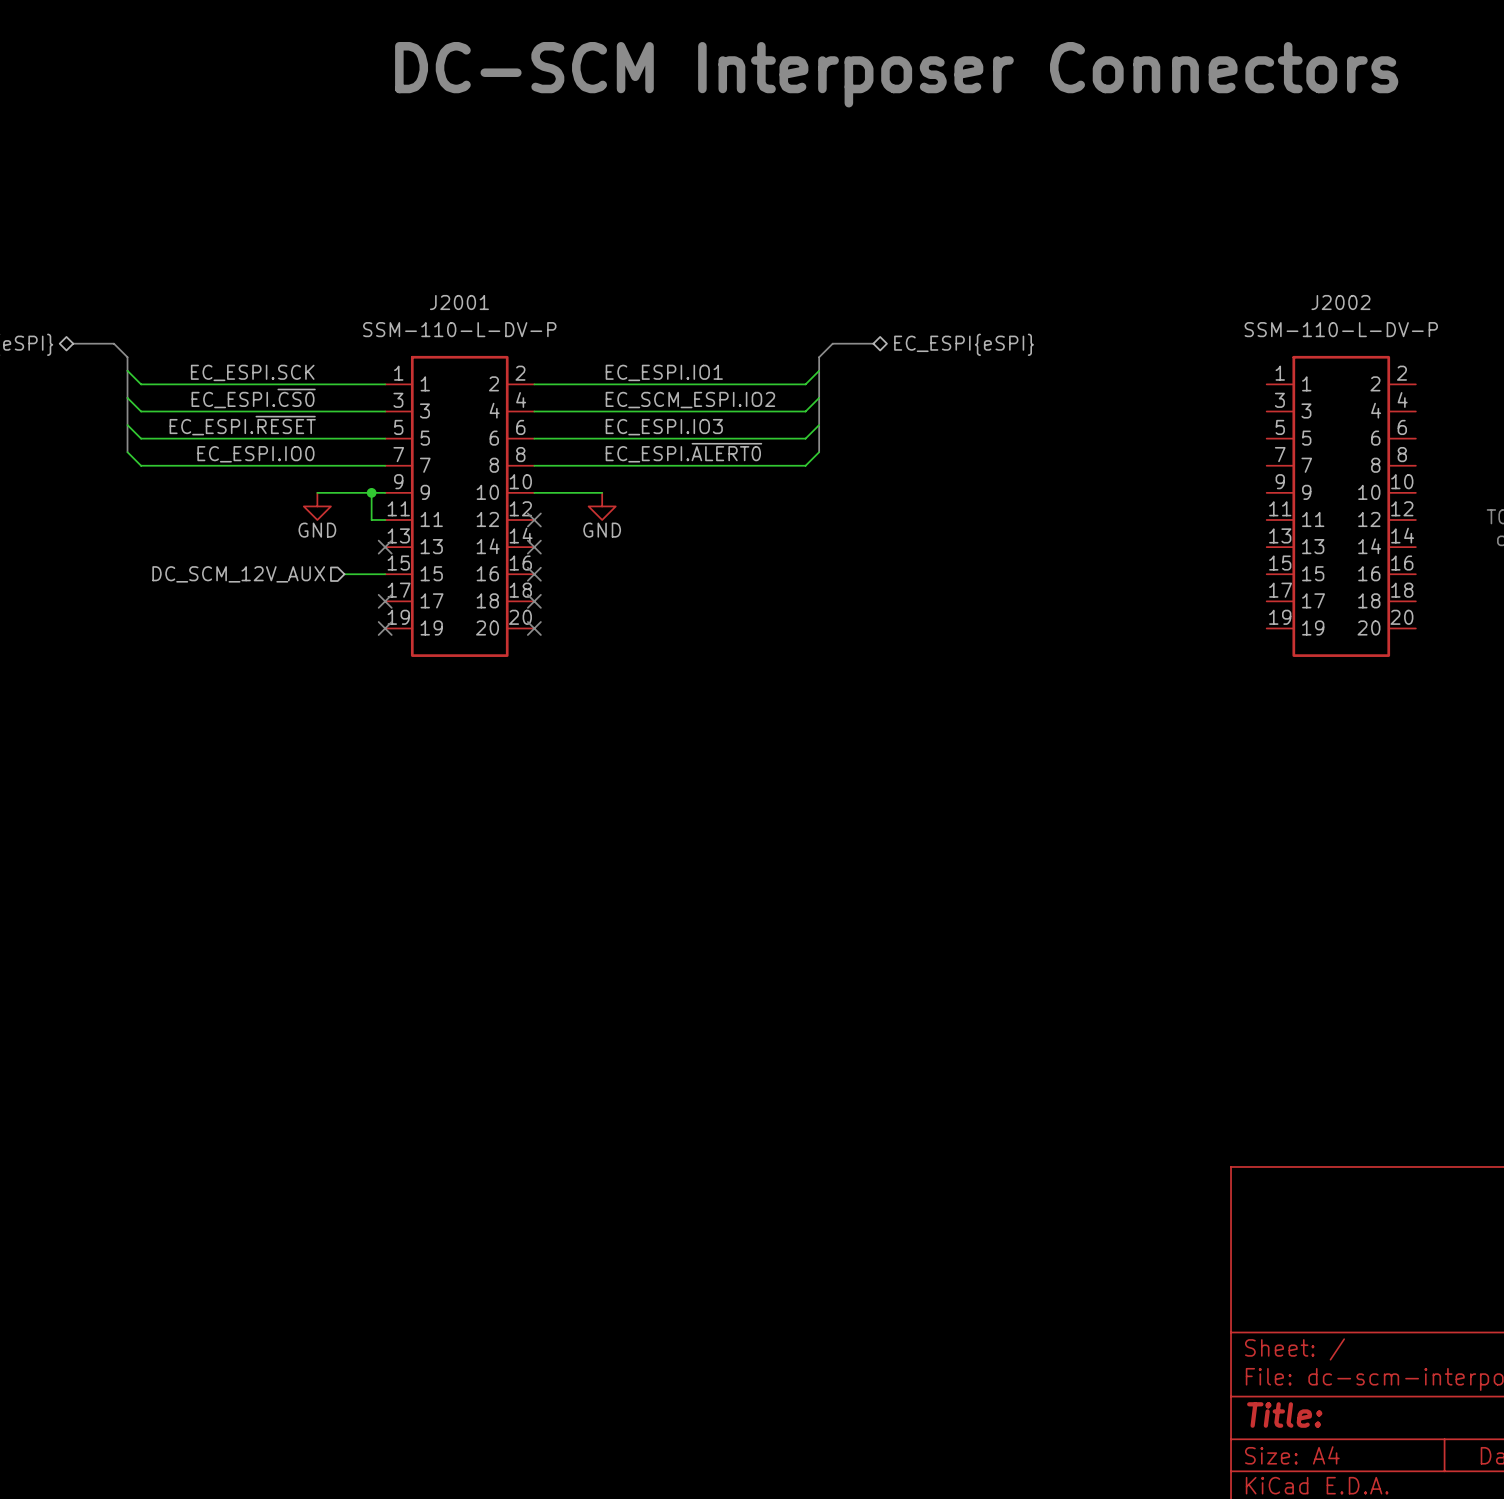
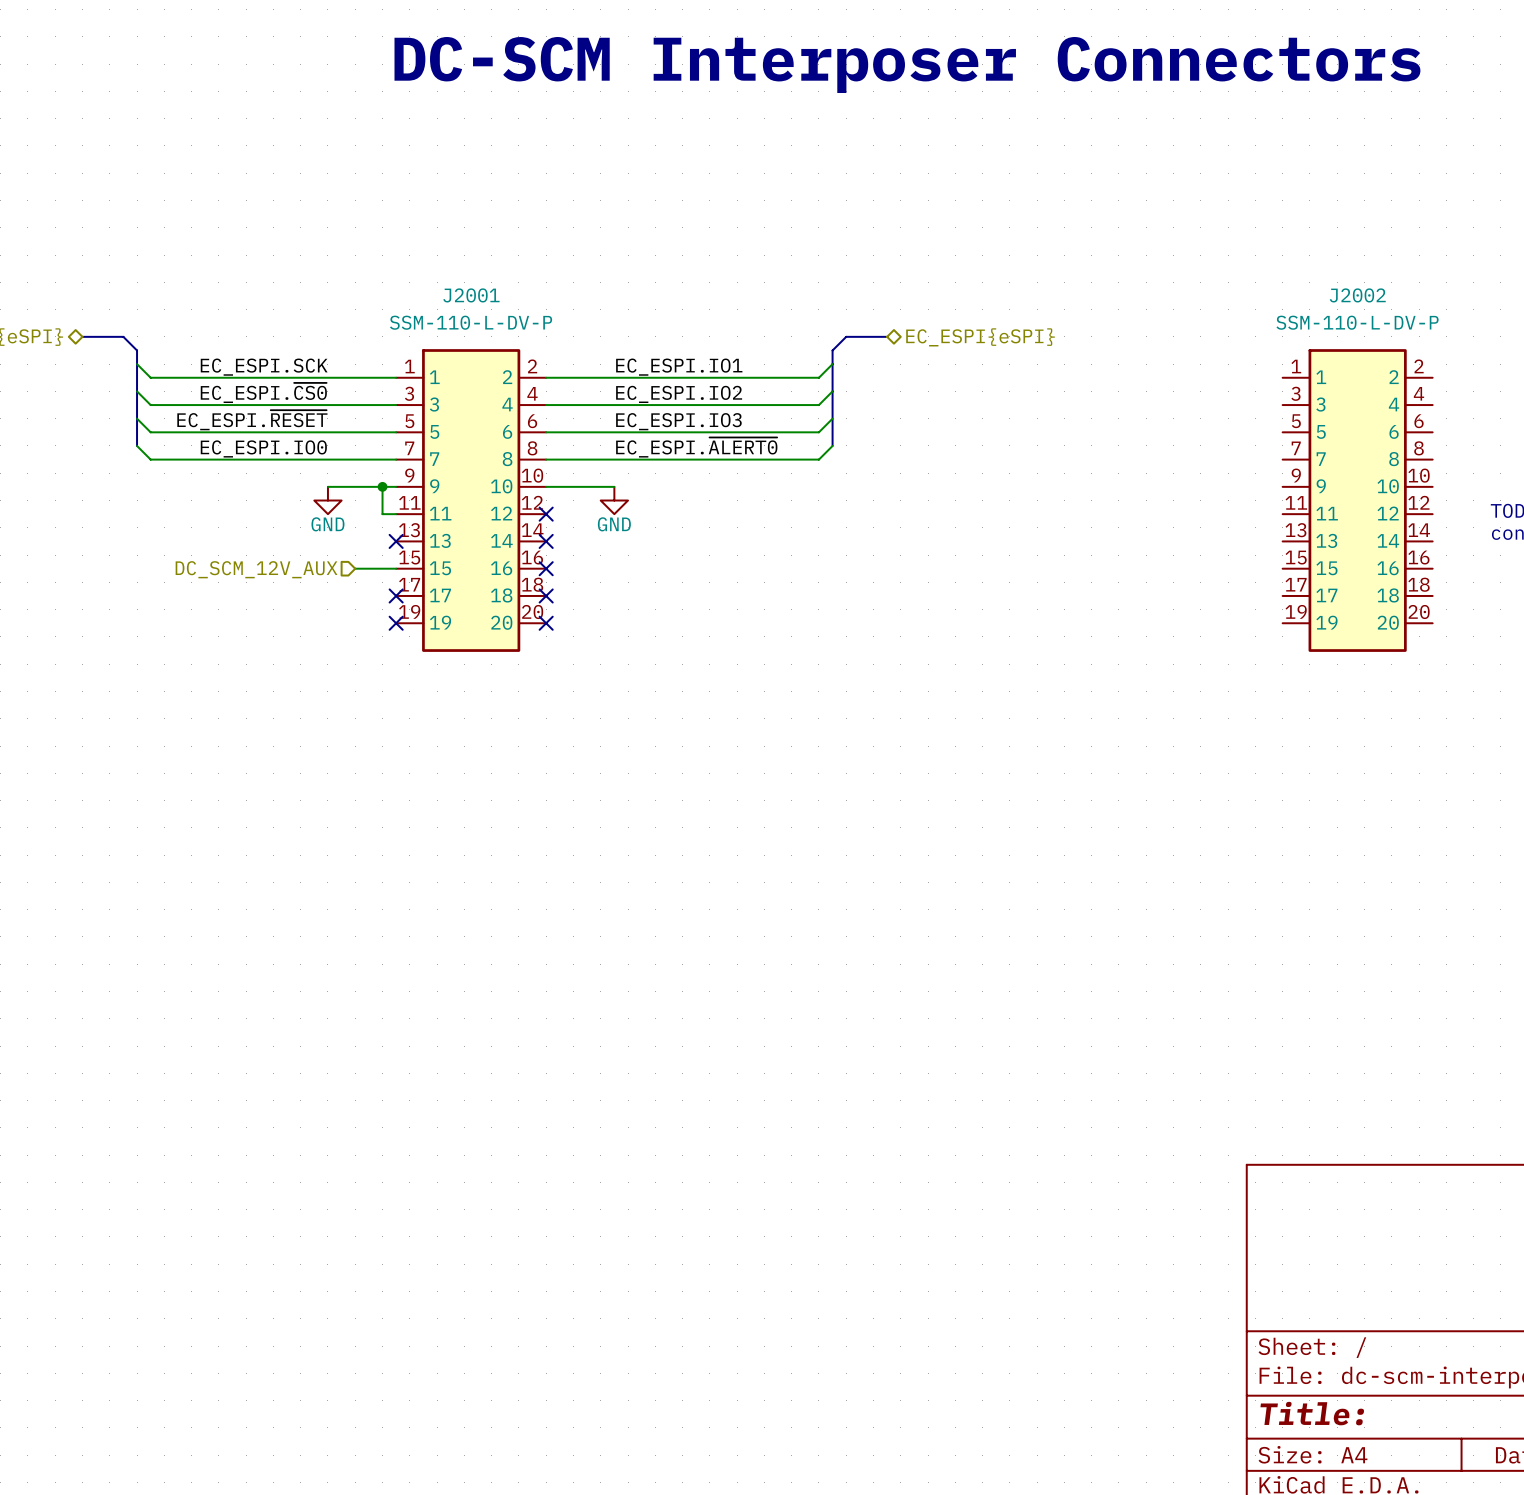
label: EC_SCM_ESPI.IO2 (690, 400) -> EC_ESPI.IO2 (679, 394)

